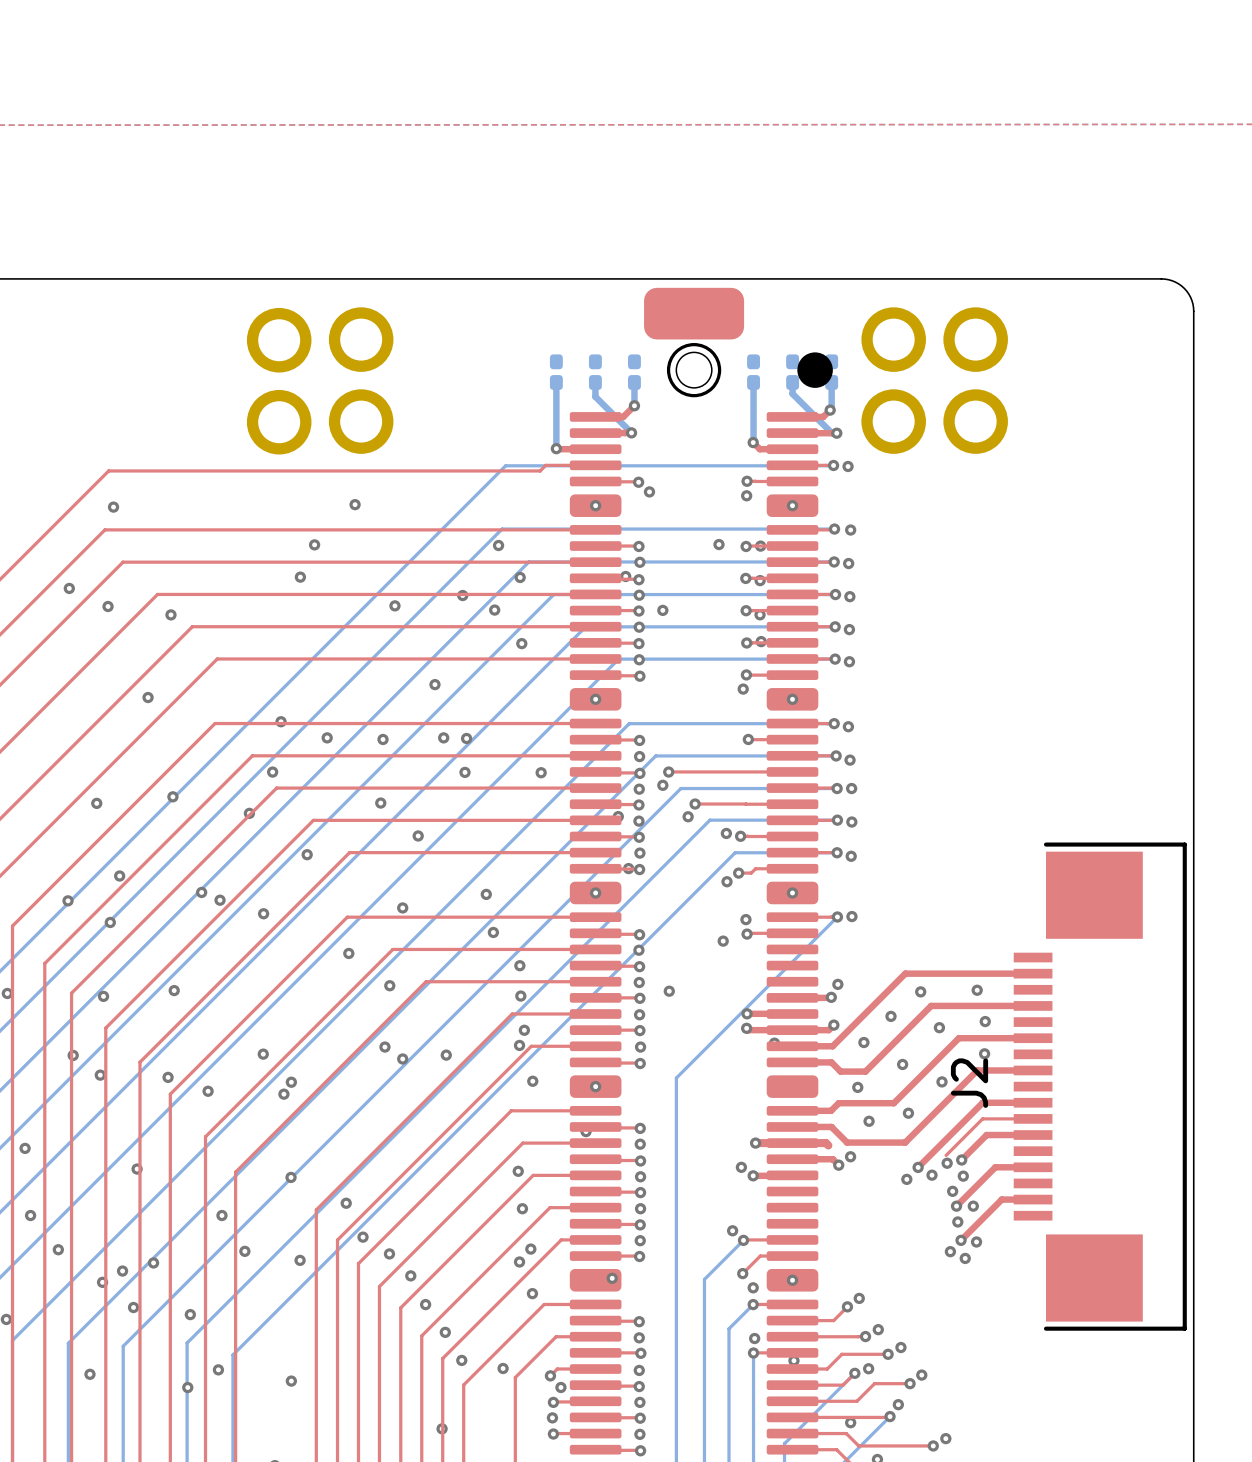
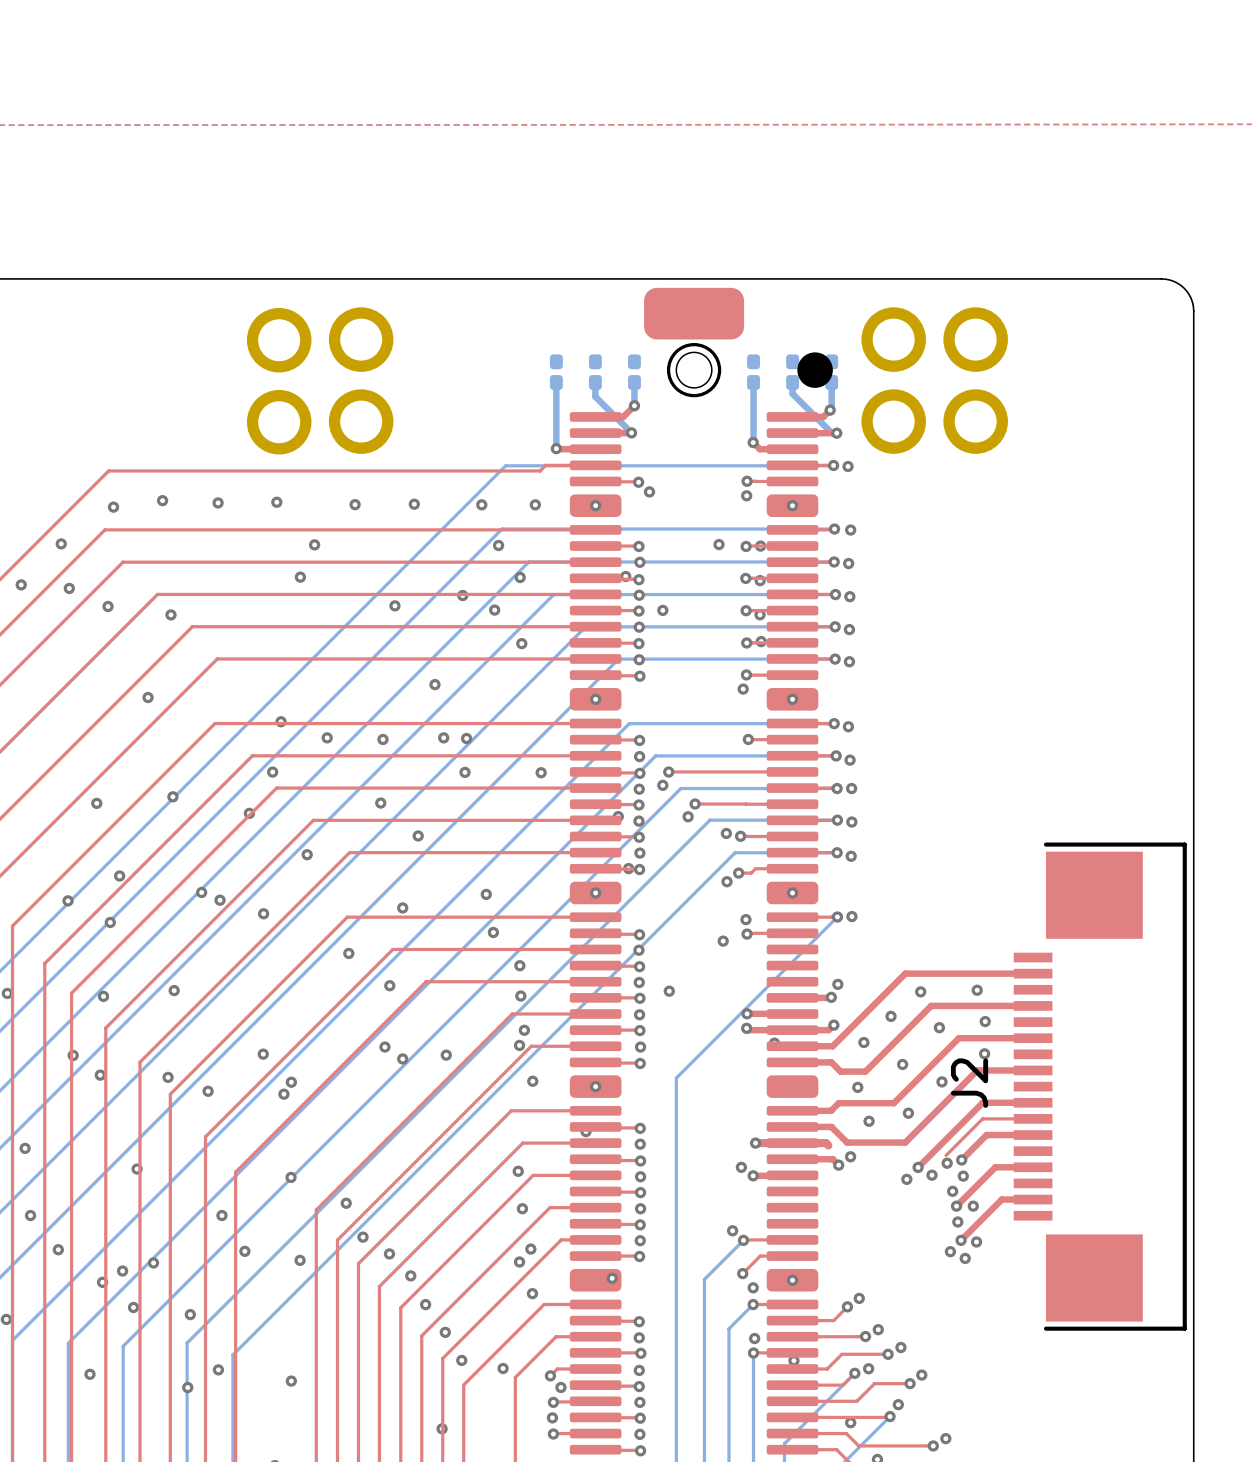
via: none -> (162, 500)
via: none -> (218, 502)
via: none -> (276, 502)
via: none -> (414, 504)
via: none -> (481, 504)
via: none -> (535, 504)
via: none -> (61, 543)
via: none -> (21, 584)

